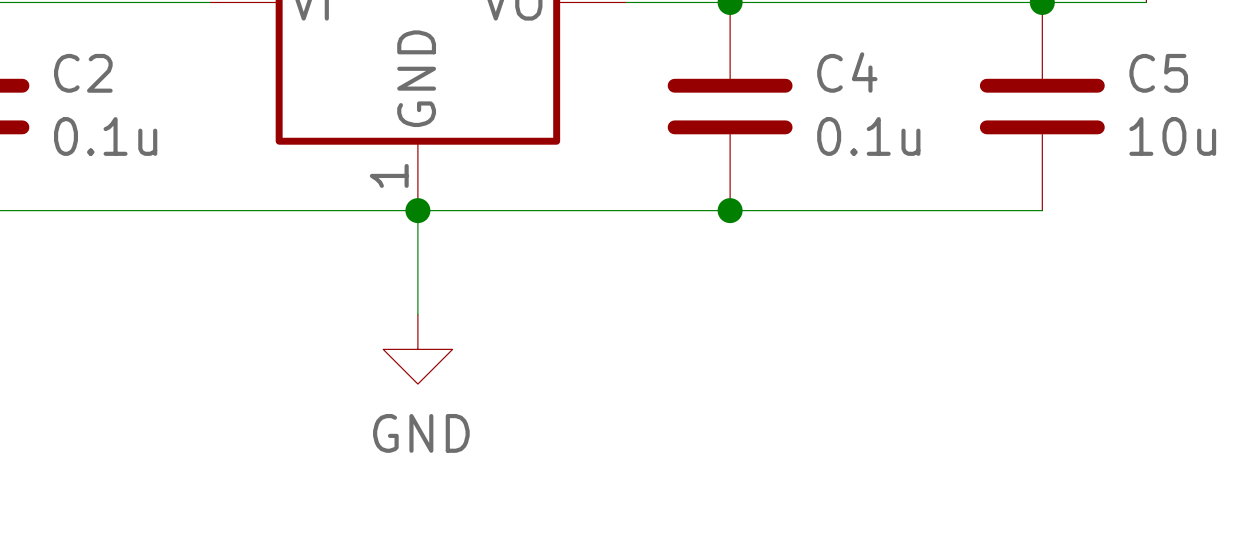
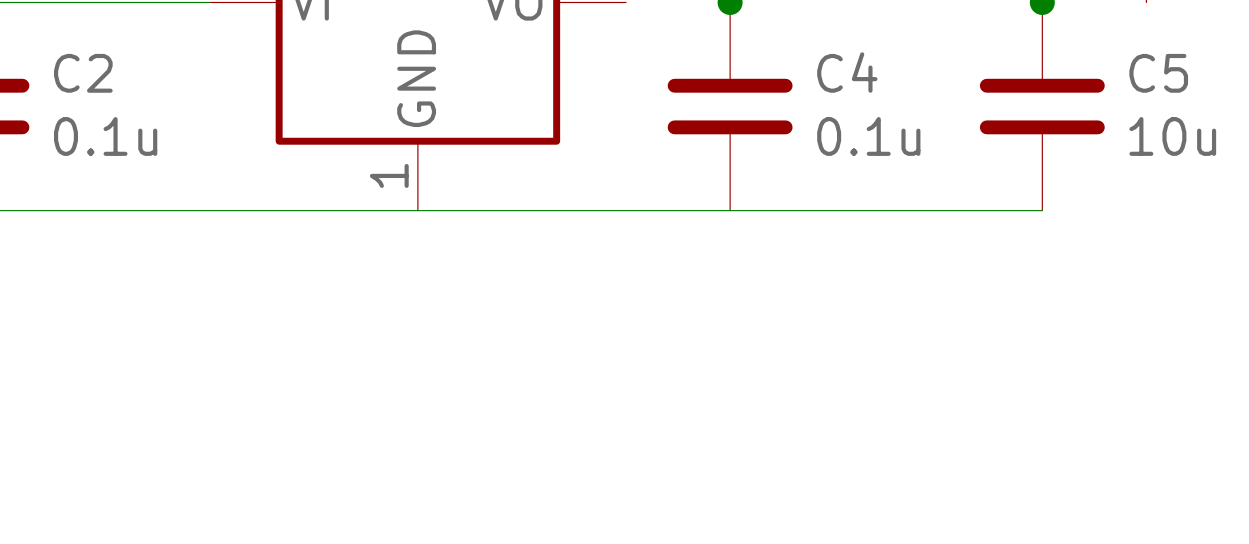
wire: (626, 2) (1146, 2) -> none
wire: (417, 210) (417, 314) -> none
junction: (417, 210) -> none
junction: (730, 210) -> none
power symbol: GND (417, 349) -> none

